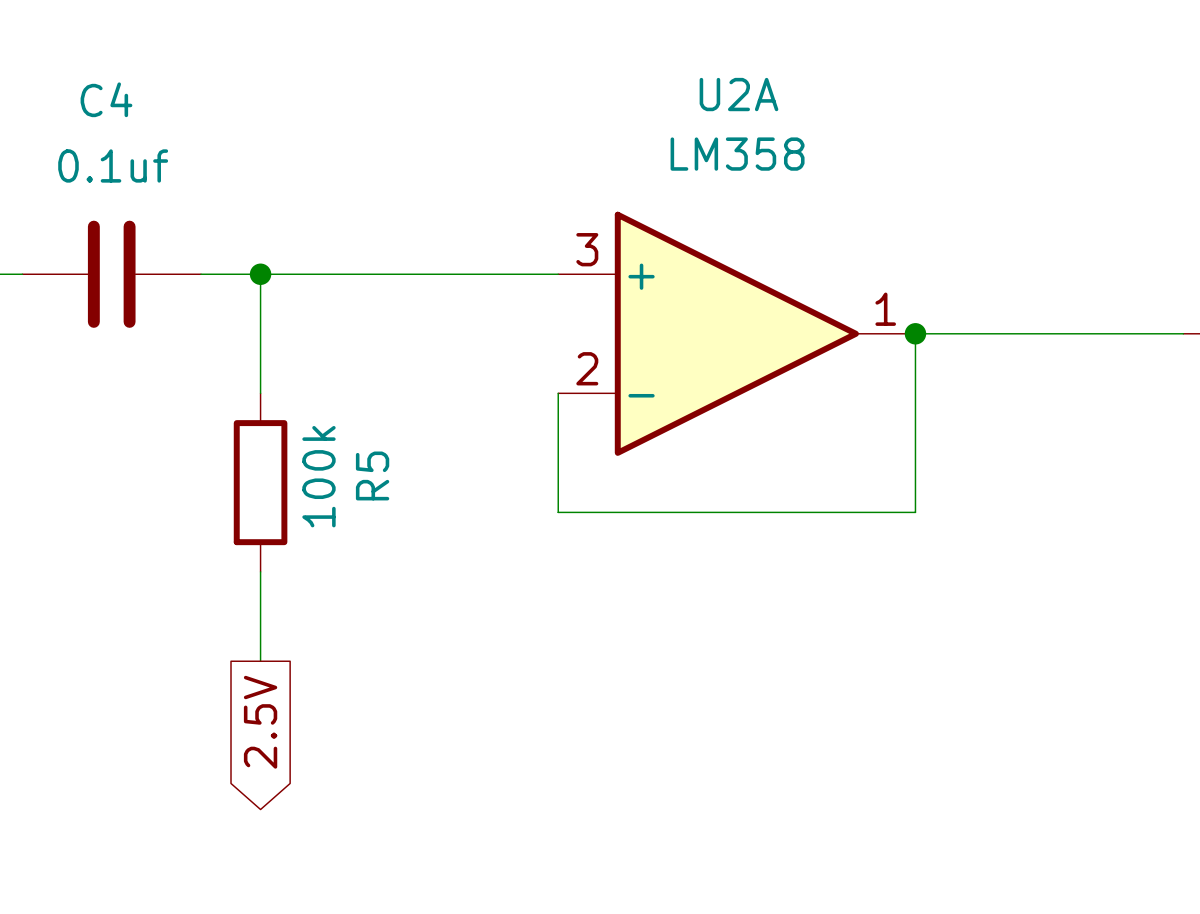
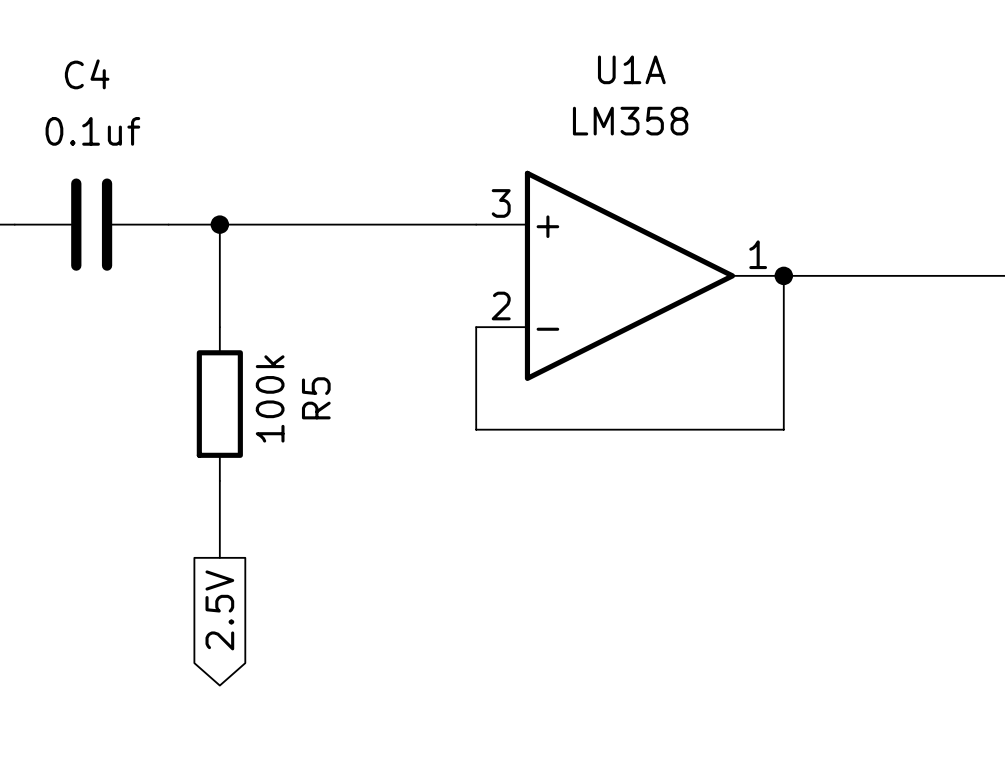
U2A name: U2A (738, 94) -> U1A (631, 69)

